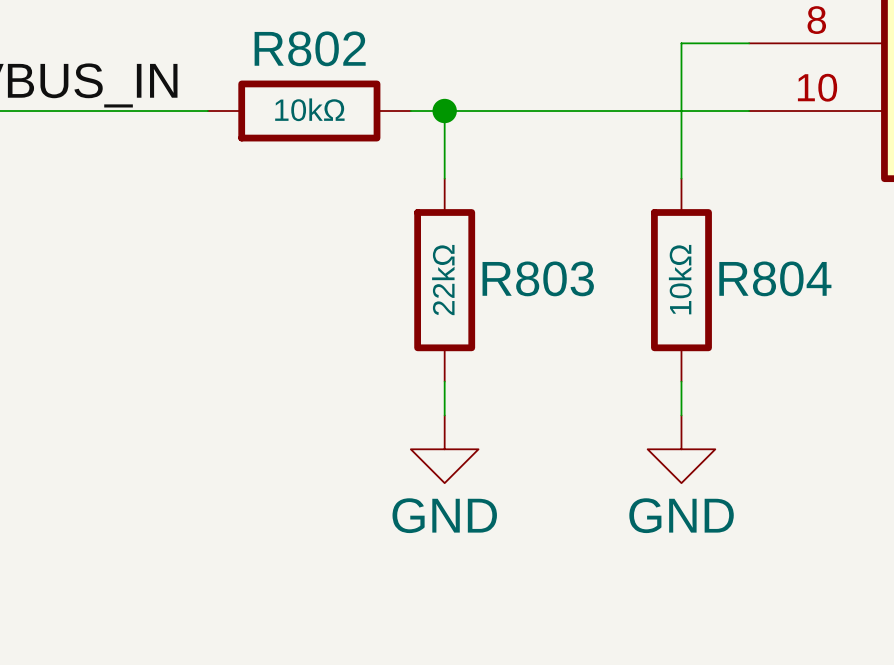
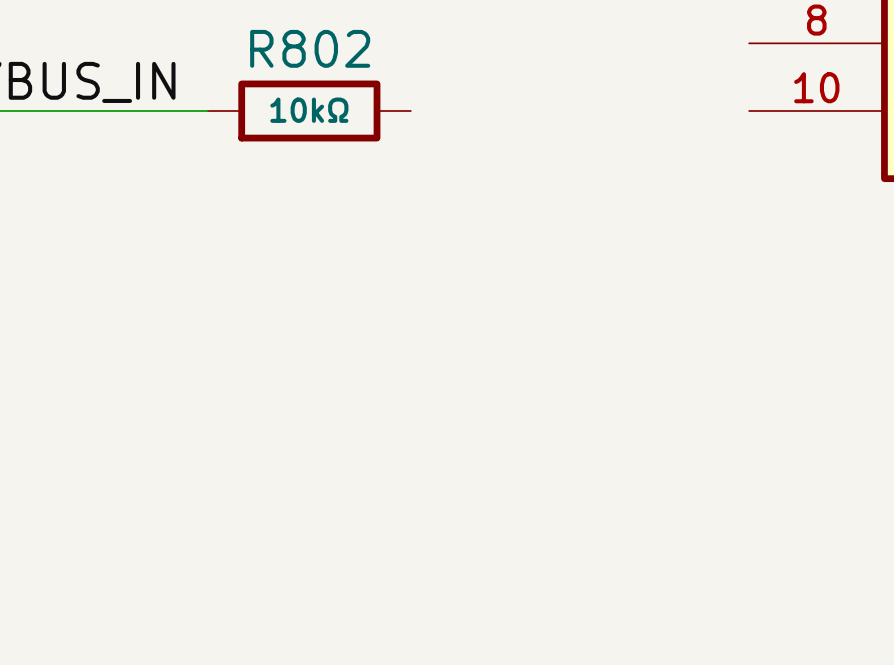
wire: (749, 43) (681, 43) (681, 178) -> none
wire: (410, 111) (749, 111) -> none
wire: (444, 111) (444, 178) -> none
junction: (444, 111) -> none
R803: 22kΩ (444, 280) -> none
R804: 10kΩ (681, 280) -> none
wire: (444, 381) (444, 415) -> none
wire: (681, 381) (681, 415) -> none
power symbol: GND (444, 449) -> none
power symbol: GND (681, 449) -> none

